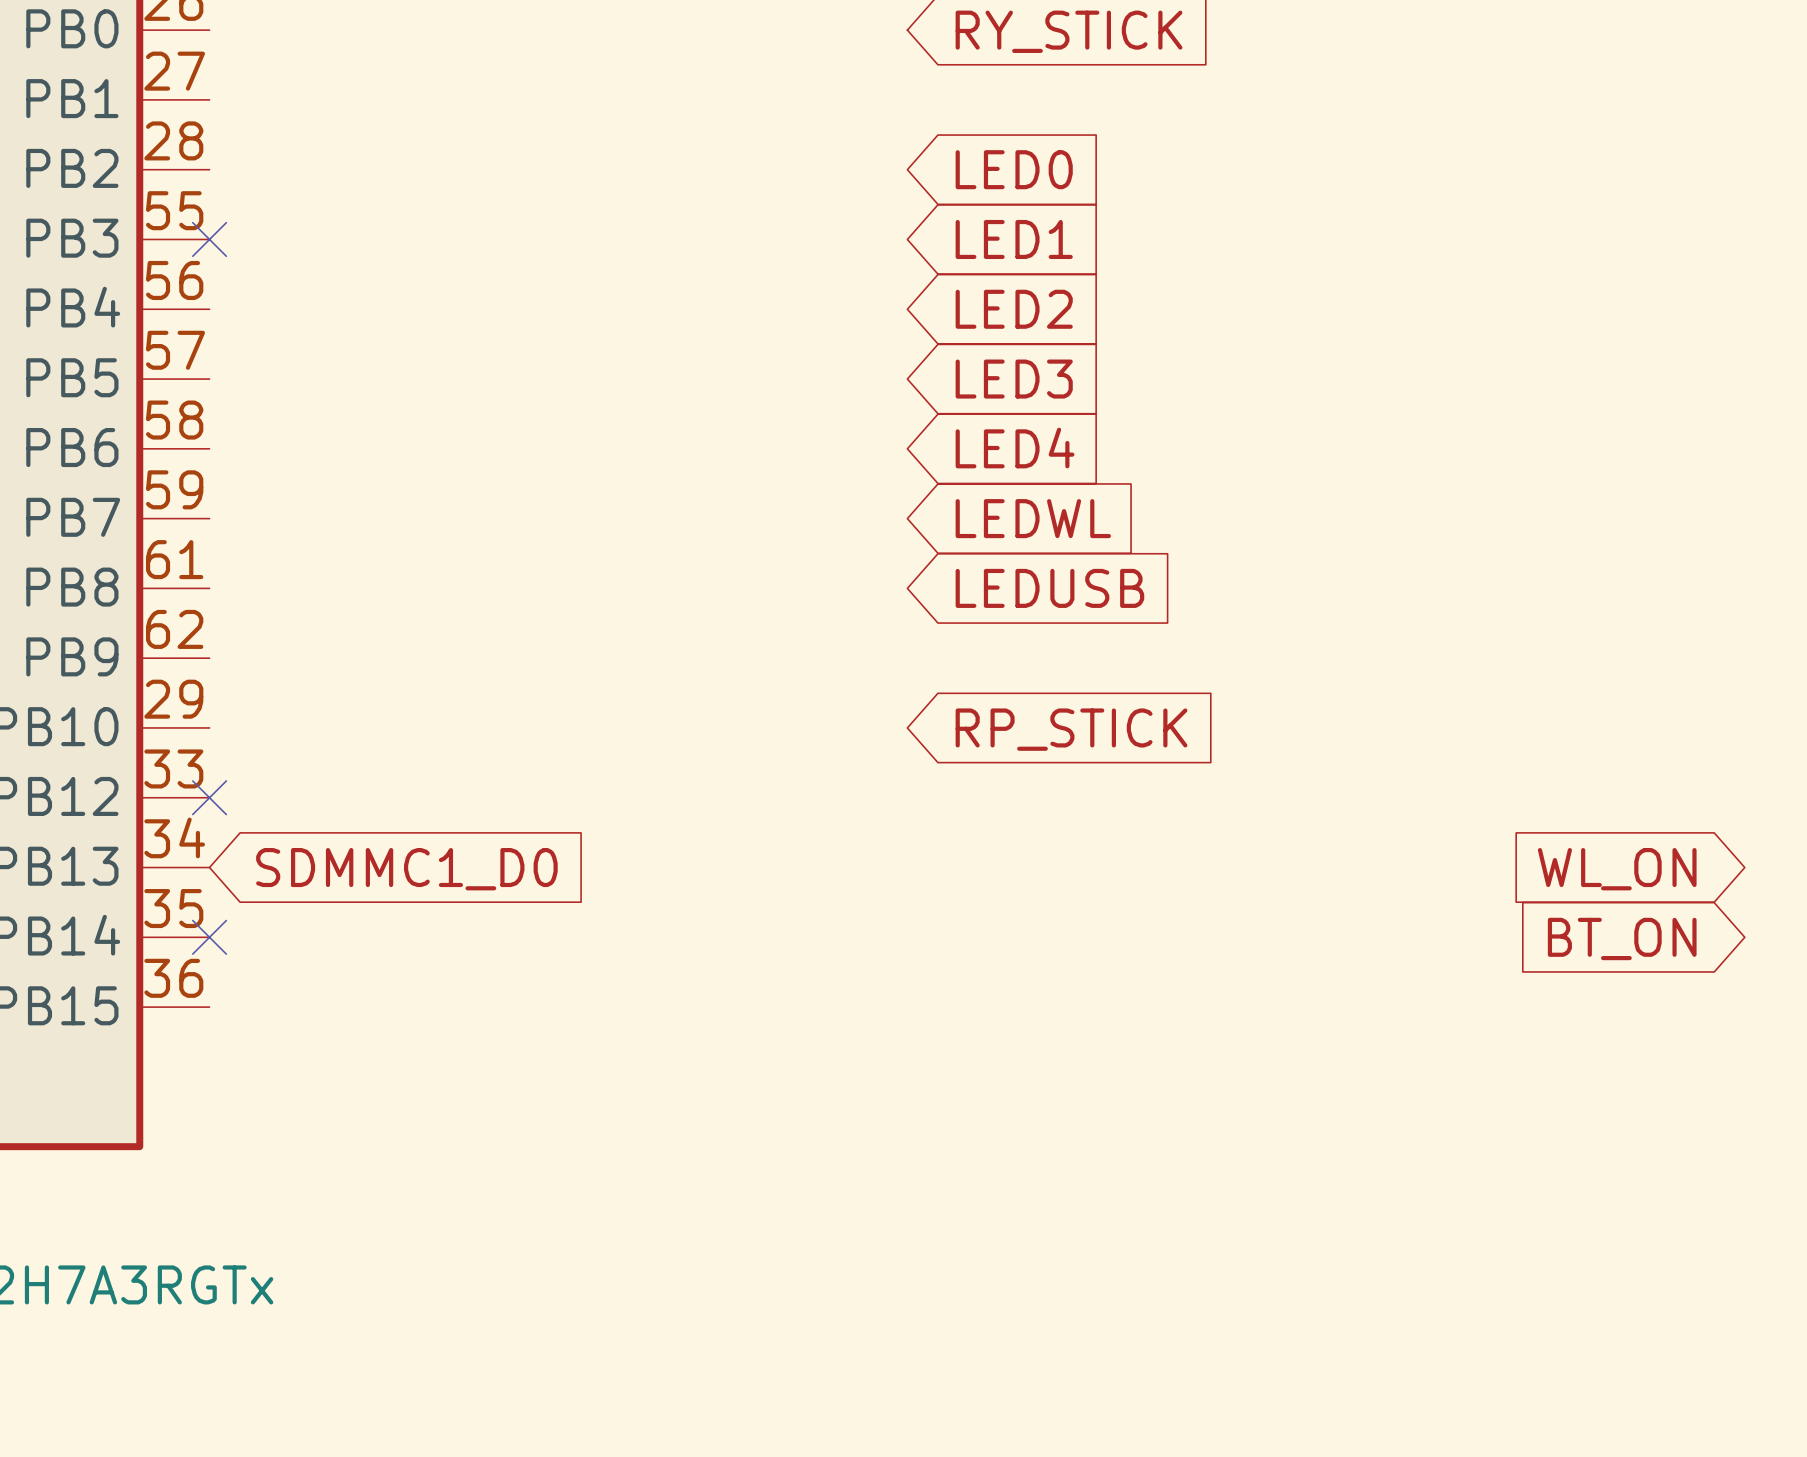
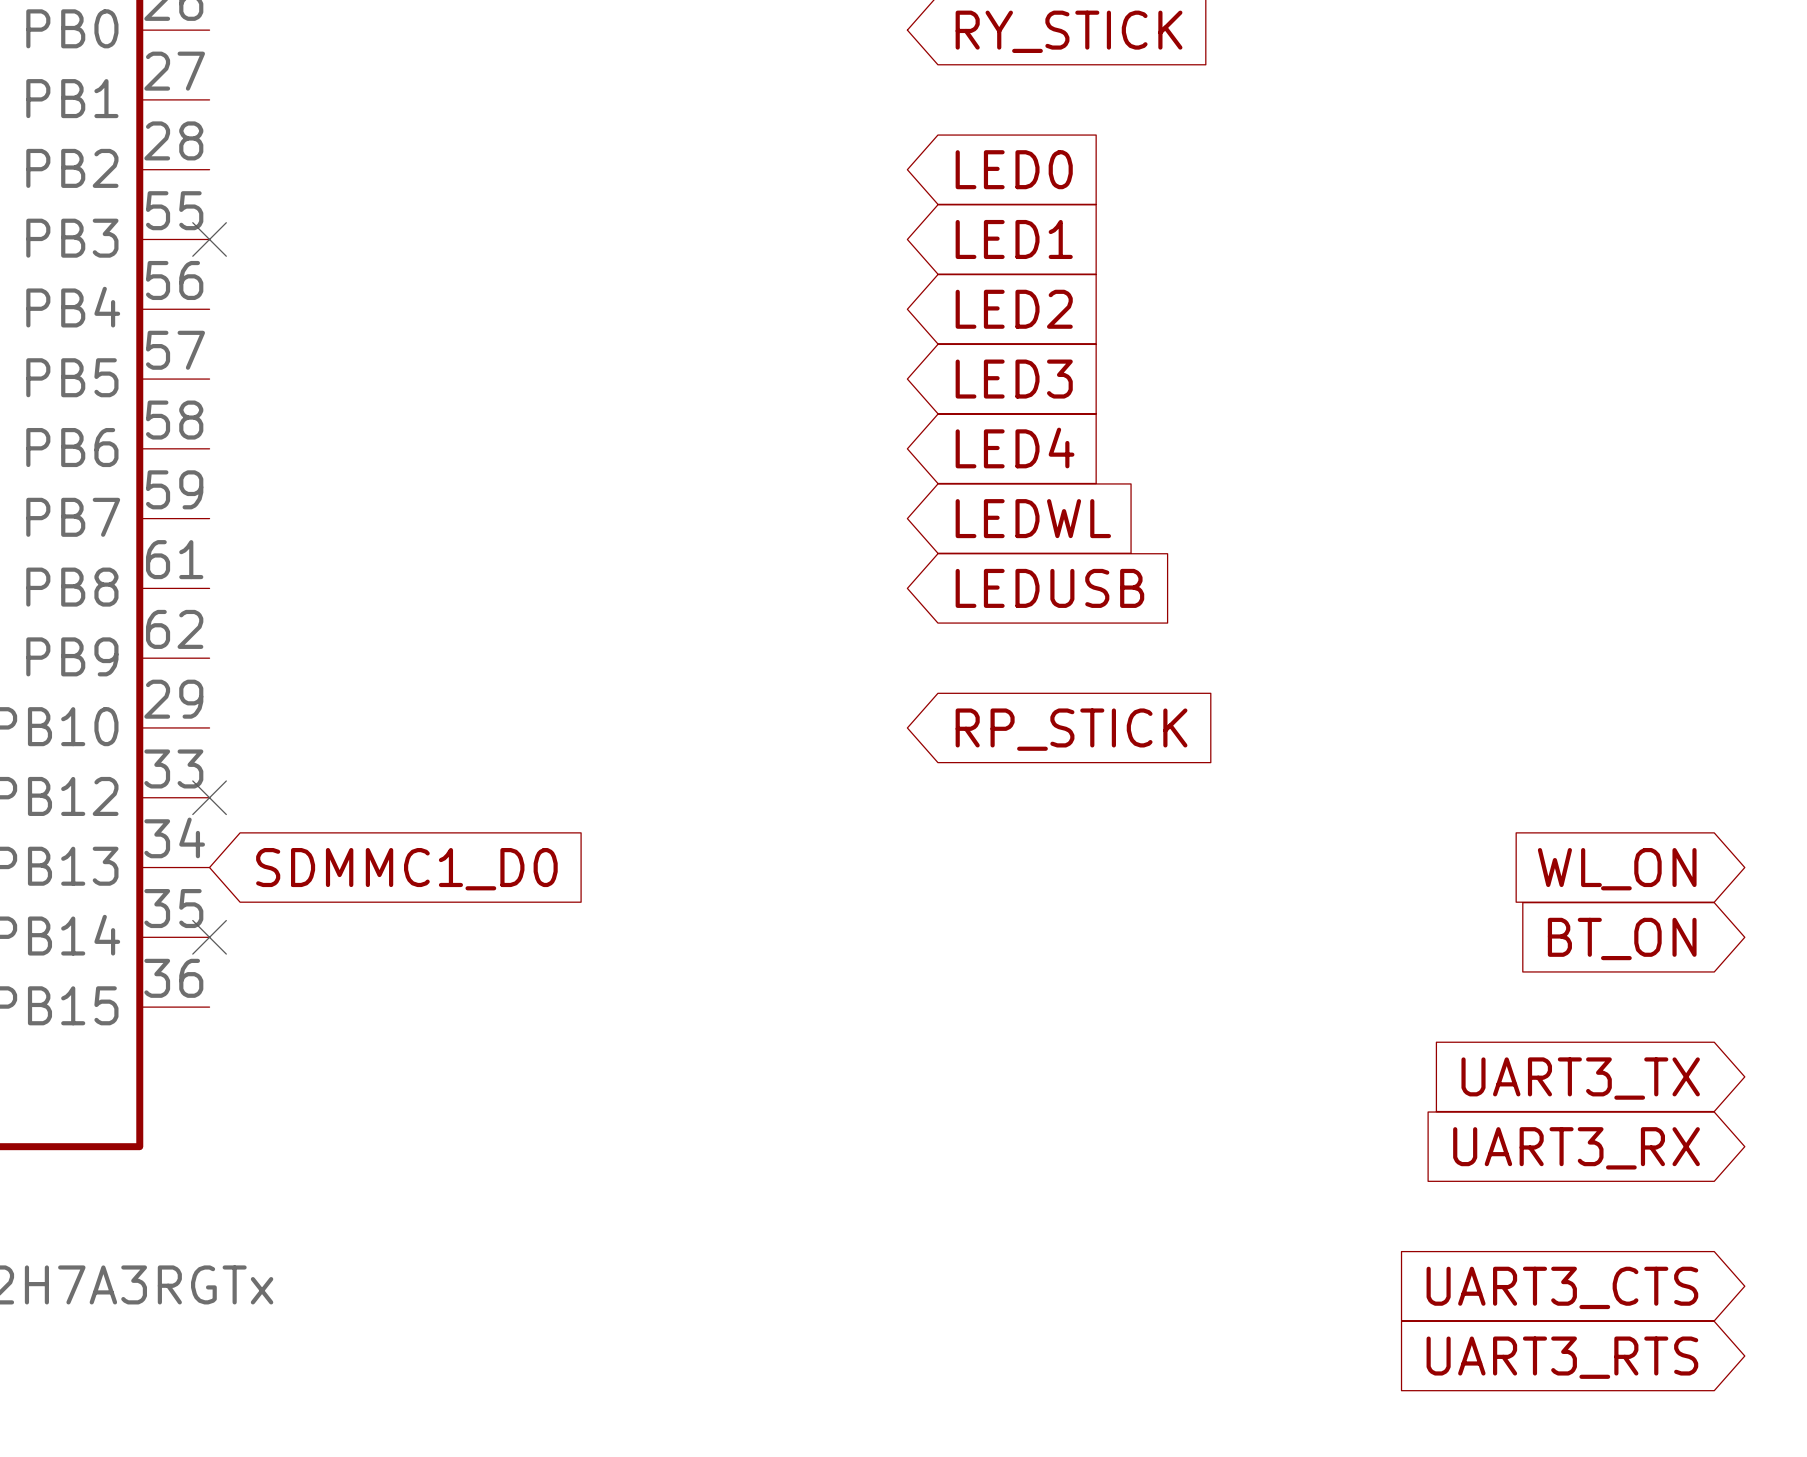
global label: none -> UART3_TX (1580, 1078)
global label: none -> UART3_RX (1576, 1148)
global label: none -> UART3_CTS (1562, 1287)
global label: none -> UART3_RTS (1562, 1357)

